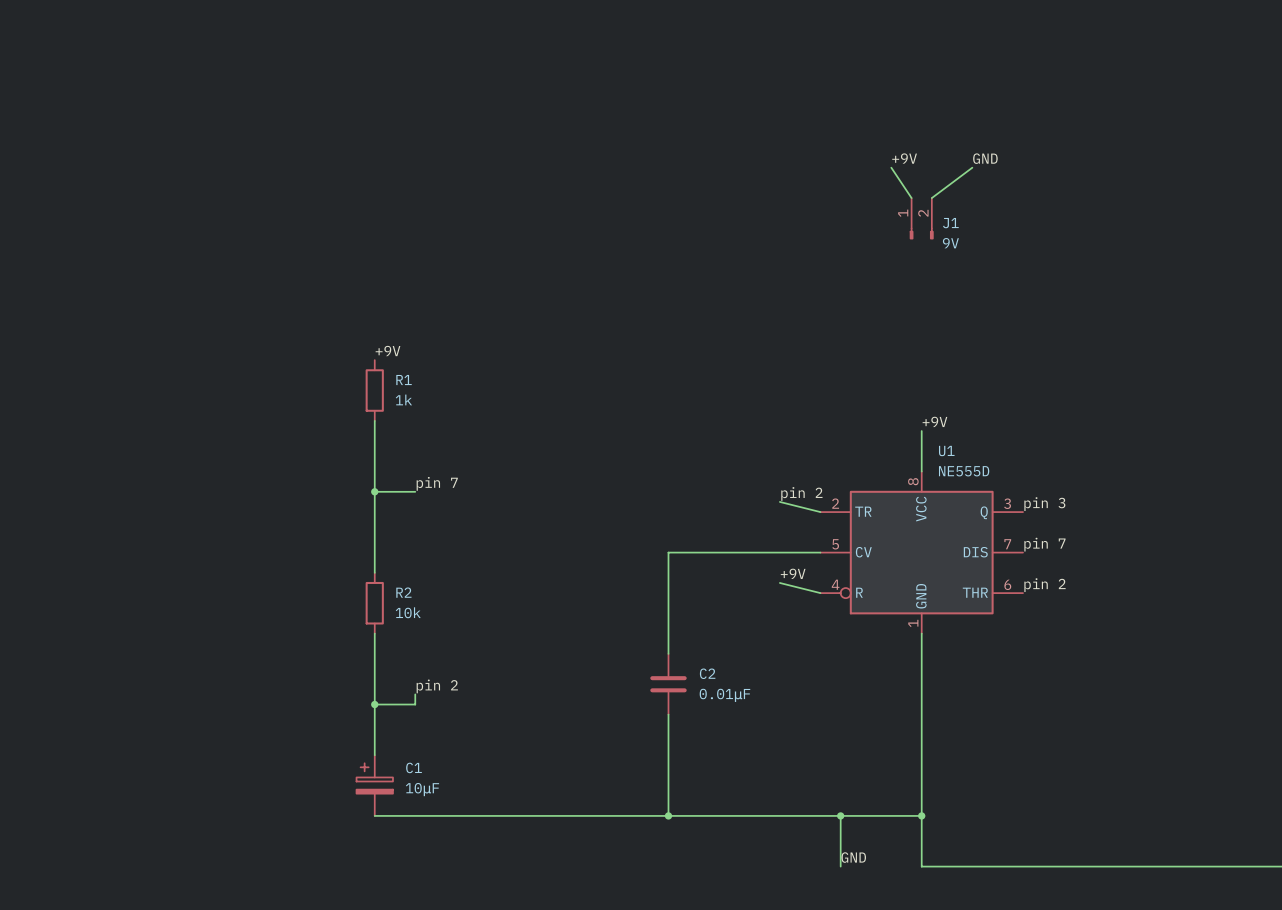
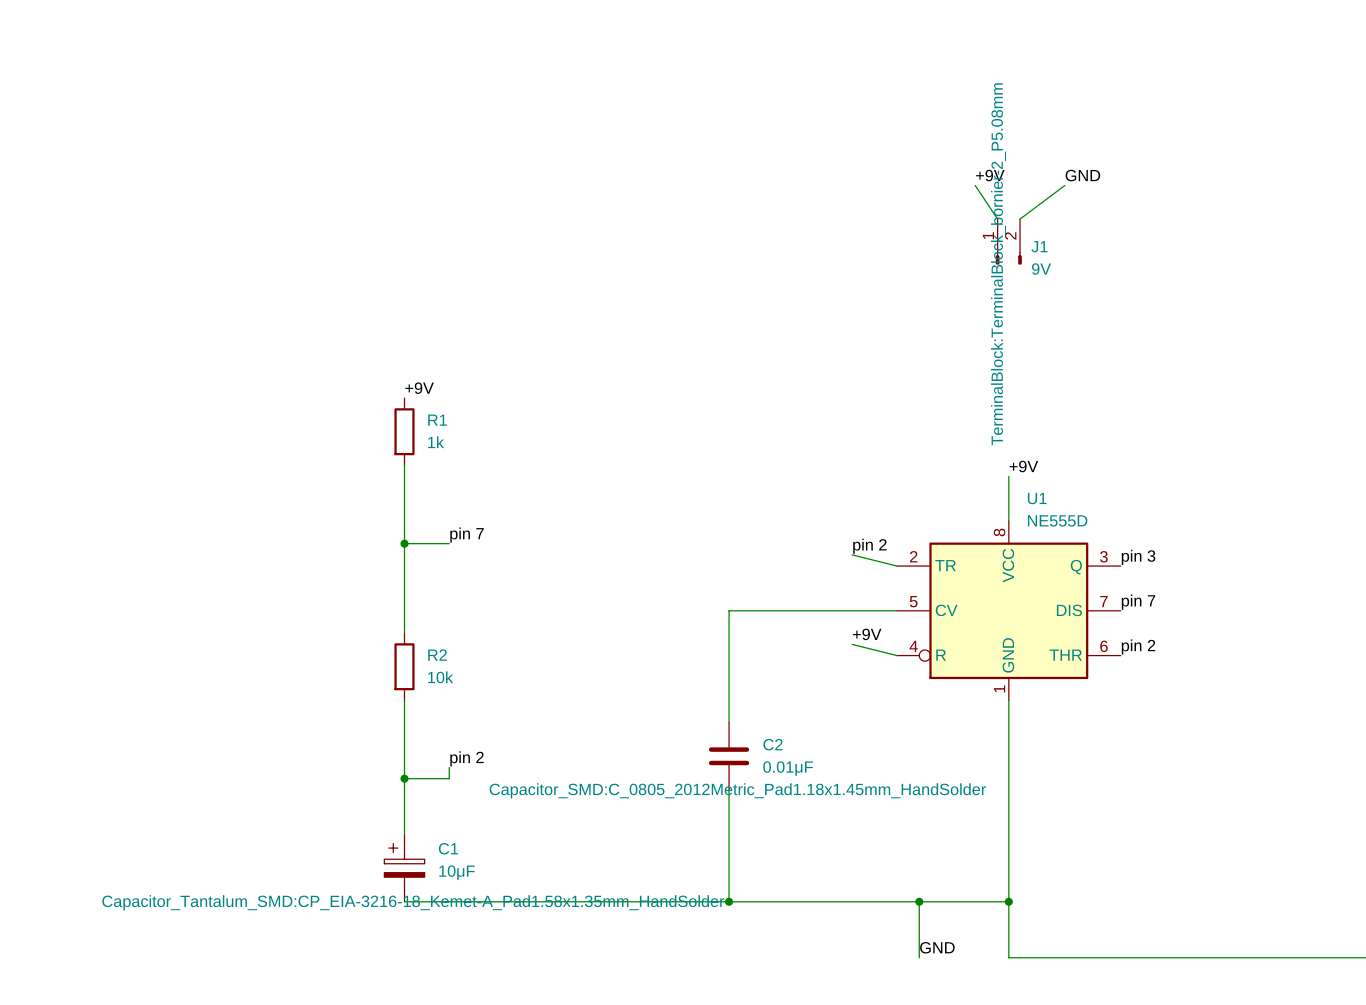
J1 text: none -> TerminalBlock:TerminalBlock_bornier-2_P5.08mm (998, 264)
C2 text: none -> Capacitor_SMD:C_0805_2012Metric_Pad1.18x1.45mm_HandSolder (737, 790)
C1 text: none -> Capacitor_Tantalum_SMD:CP_EIA-3216-18_Kemet-A_Pad1.58x1.35mm_HandSolder (413, 902)

